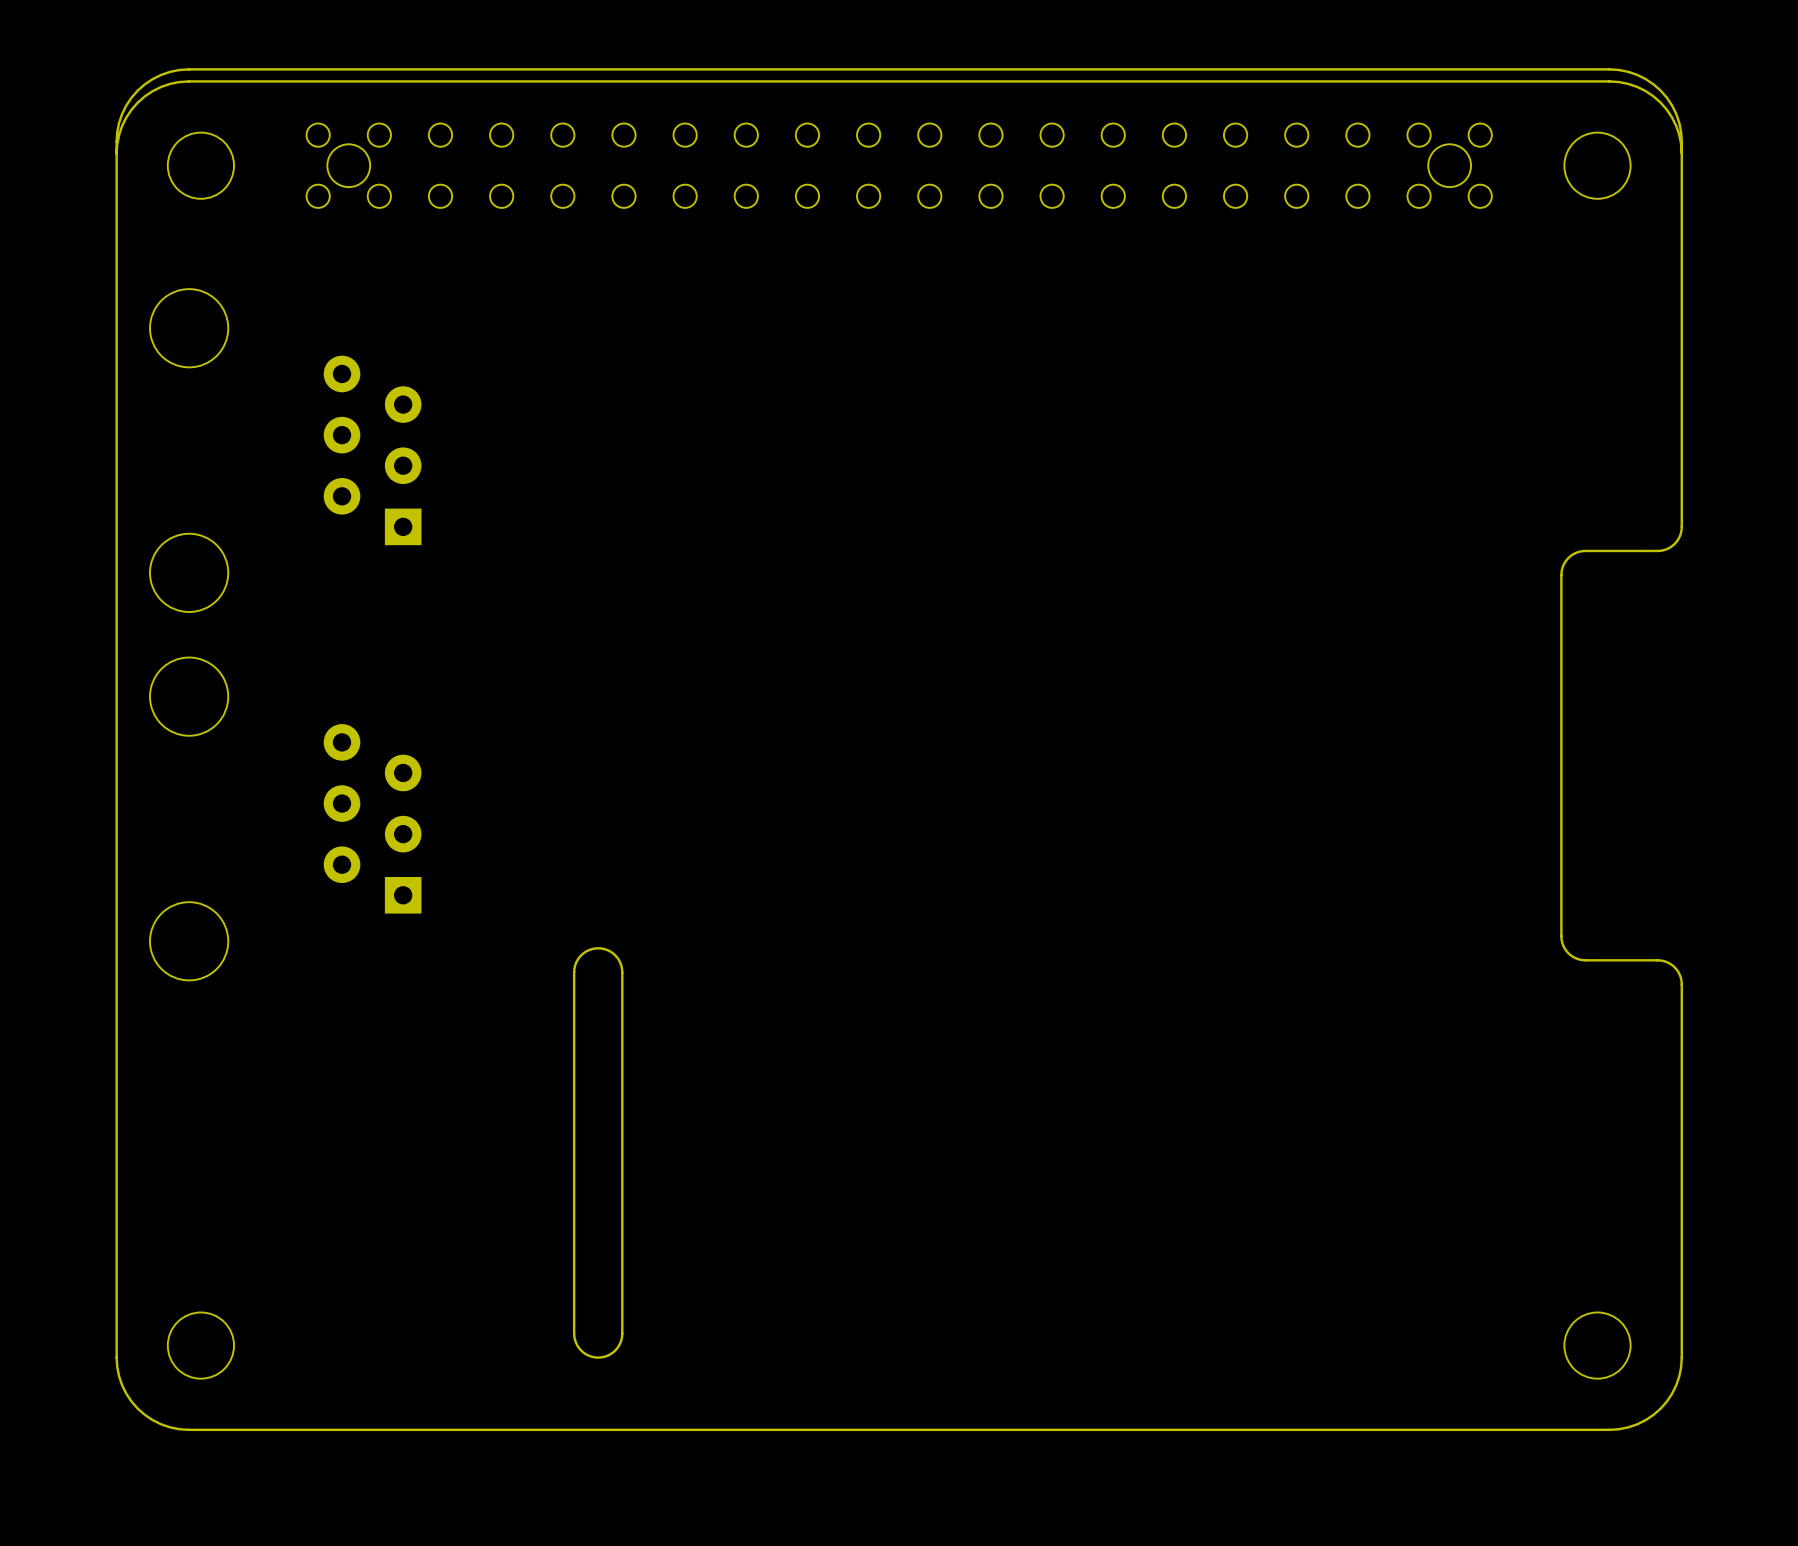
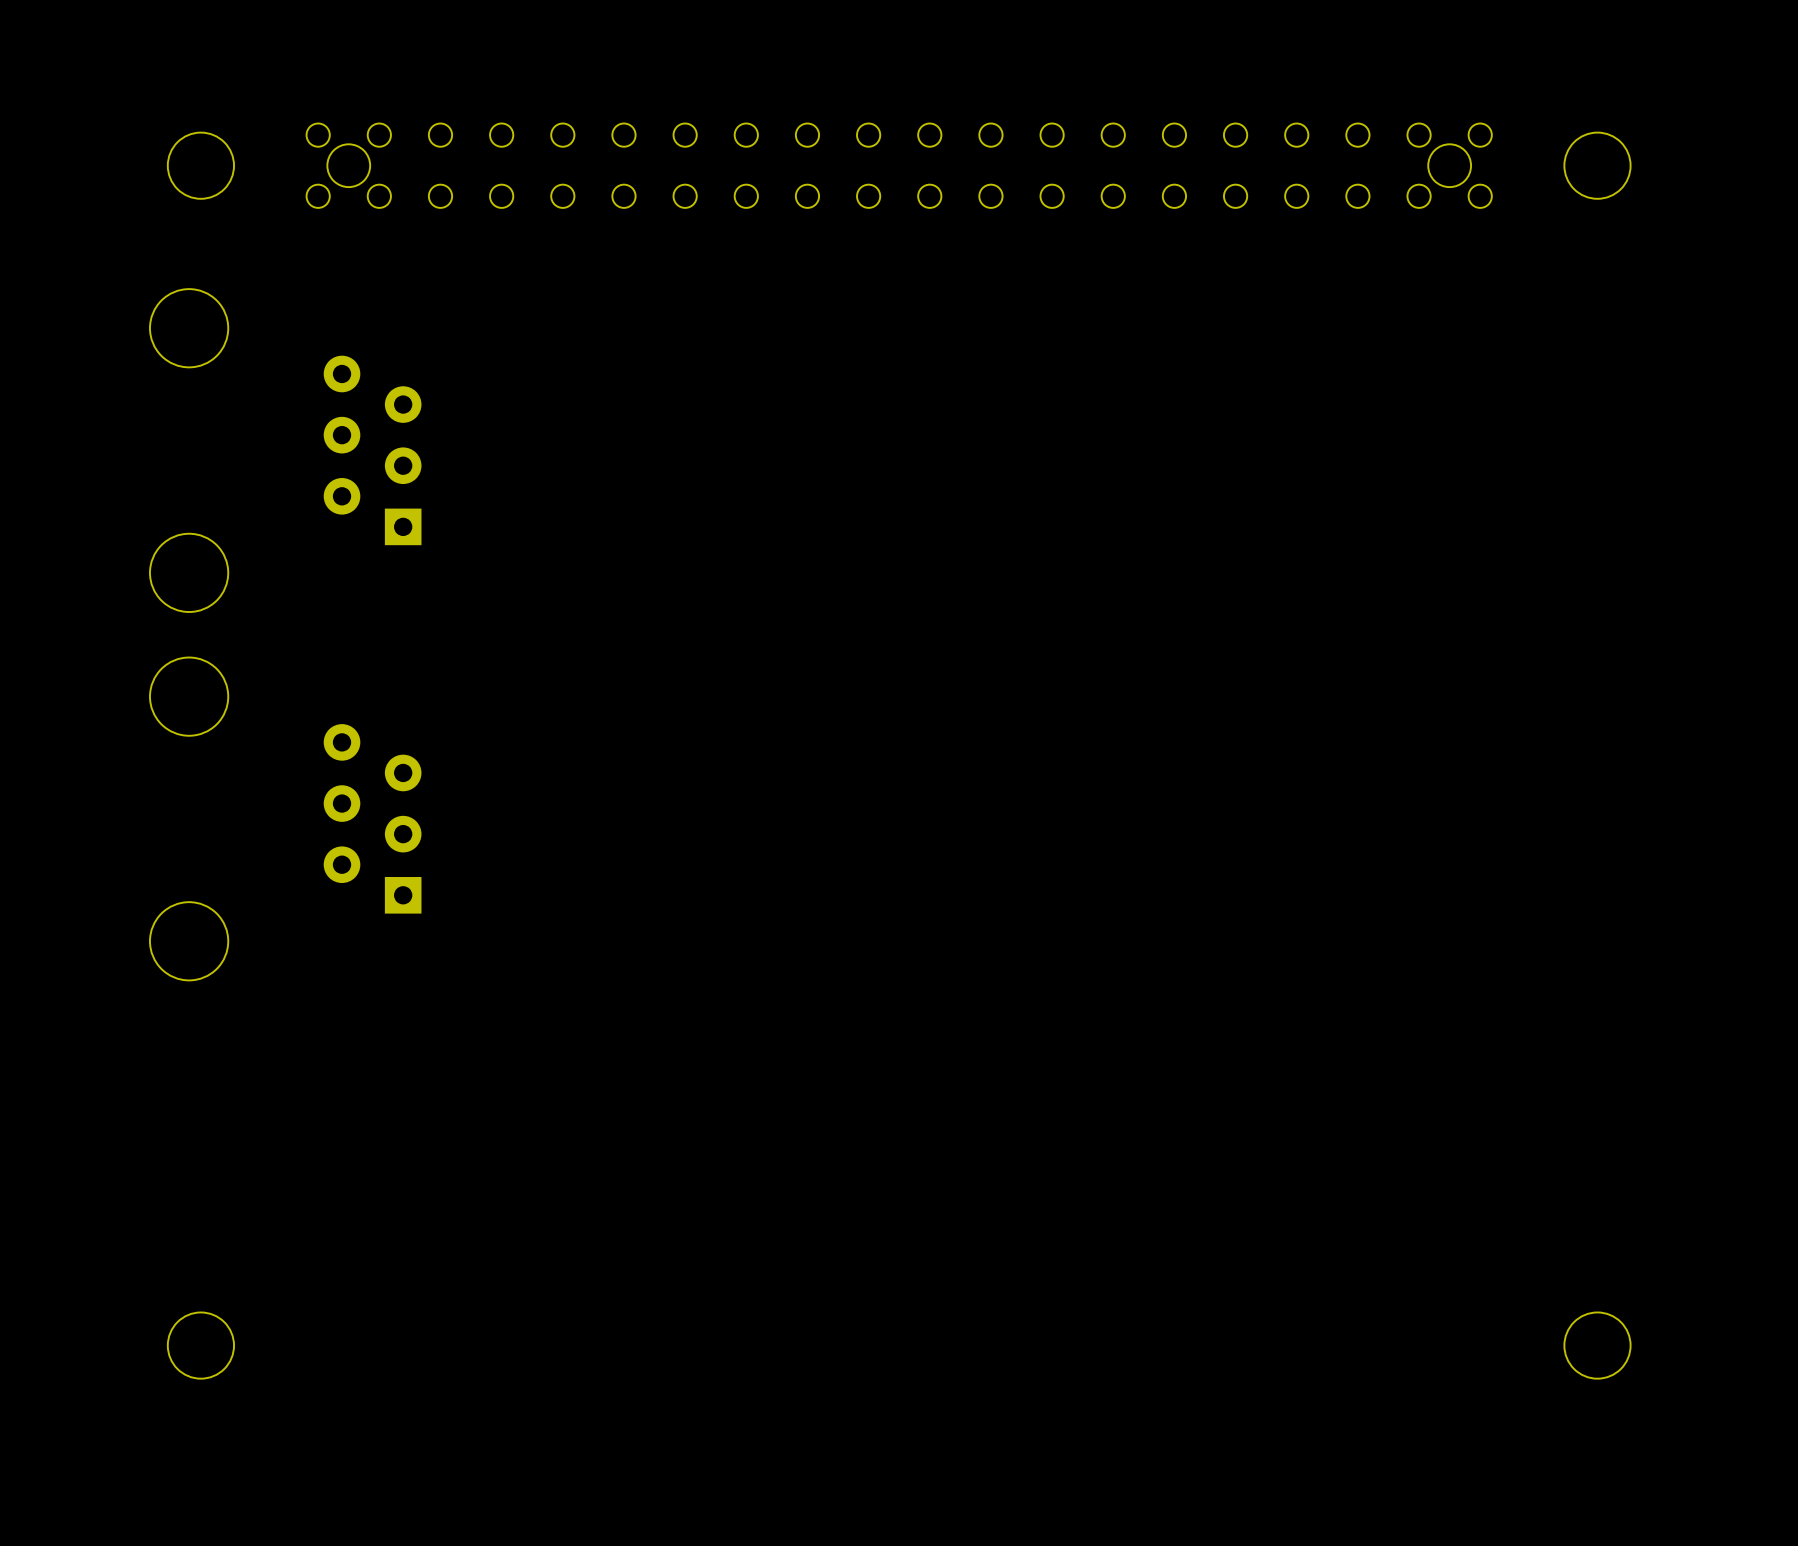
board edge: (1609, 69) (188, 69) (161, 74) (137, 90) (122, 113) (116, 141) (116, 1357) (122, 1385) (137, 1408) (161, 1424) (188, 1429) (1609, 1429) (1637, 1424) (1660, 1408) (1676, 1385) (1681, 1357) (1680, 978) (1674, 967) (1660, 960) (1585, 960) (1576, 958) (1566, 950) (1561, 936) (1562, 568) (1570, 555) (1582, 551) (1657, 550) (1666, 549) (1678, 538) (1681, 526) (1681, 132) (1672, 105) (1653, 84) (1628, 71) (1609, 69) -> none
board edge: (1681, 153) (1676, 126) (1660, 102) (1637, 86) (1609, 81) (188, 81) (161, 86) (137, 102) (122, 126) (116, 153) -> none
board edge: (622, 972) (622, 1336) (619, 1345) (612, 1352) (604, 1356) (595, 1357) (586, 1354) (579, 1348) (574, 1333) (574, 969) (577, 960) (583, 953) (598, 948) (607, 950) (615, 955) (620, 963) (622, 972) -> none

